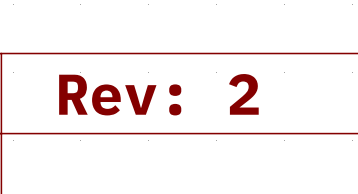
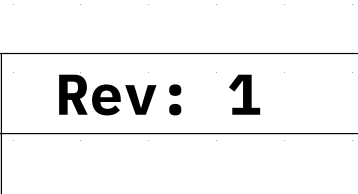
title block: Rev: 2 (158, 94) -> Rev: 1 (159, 95)

